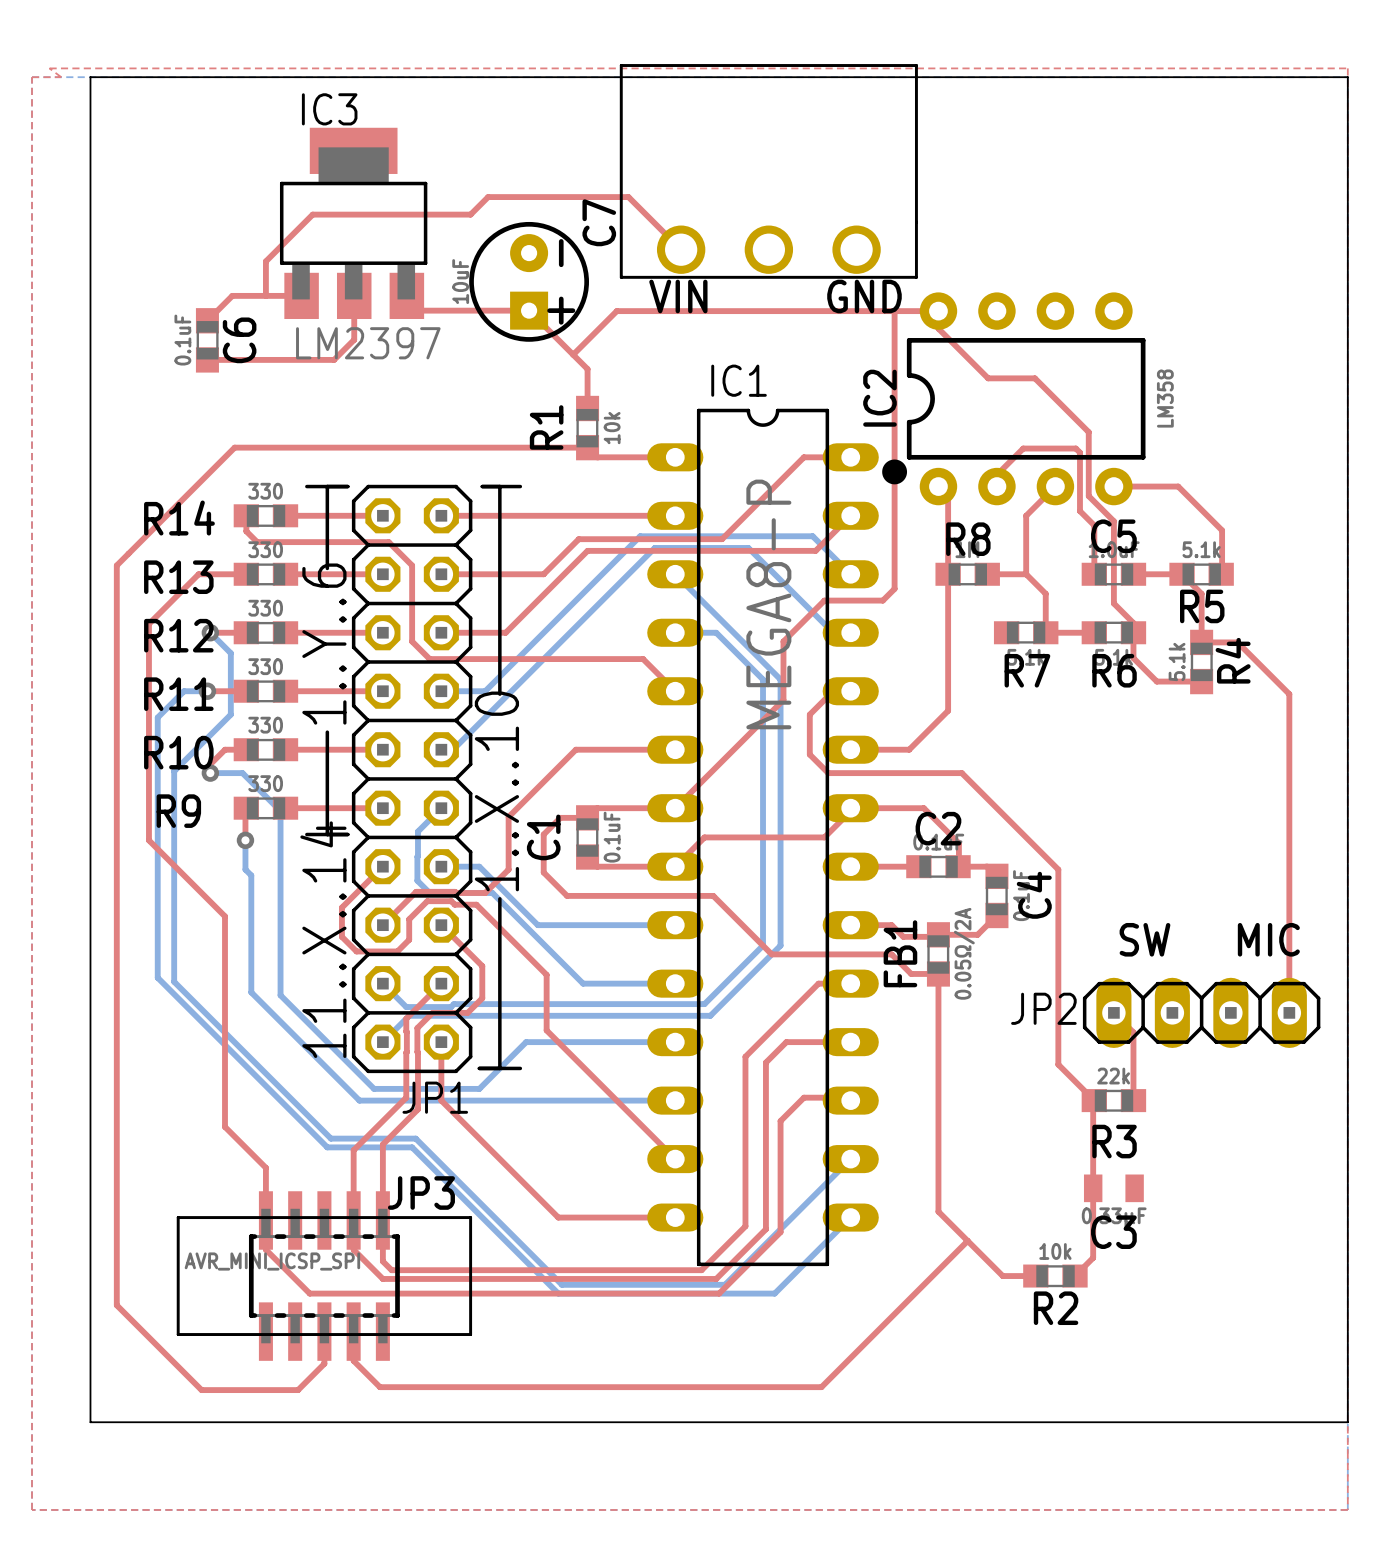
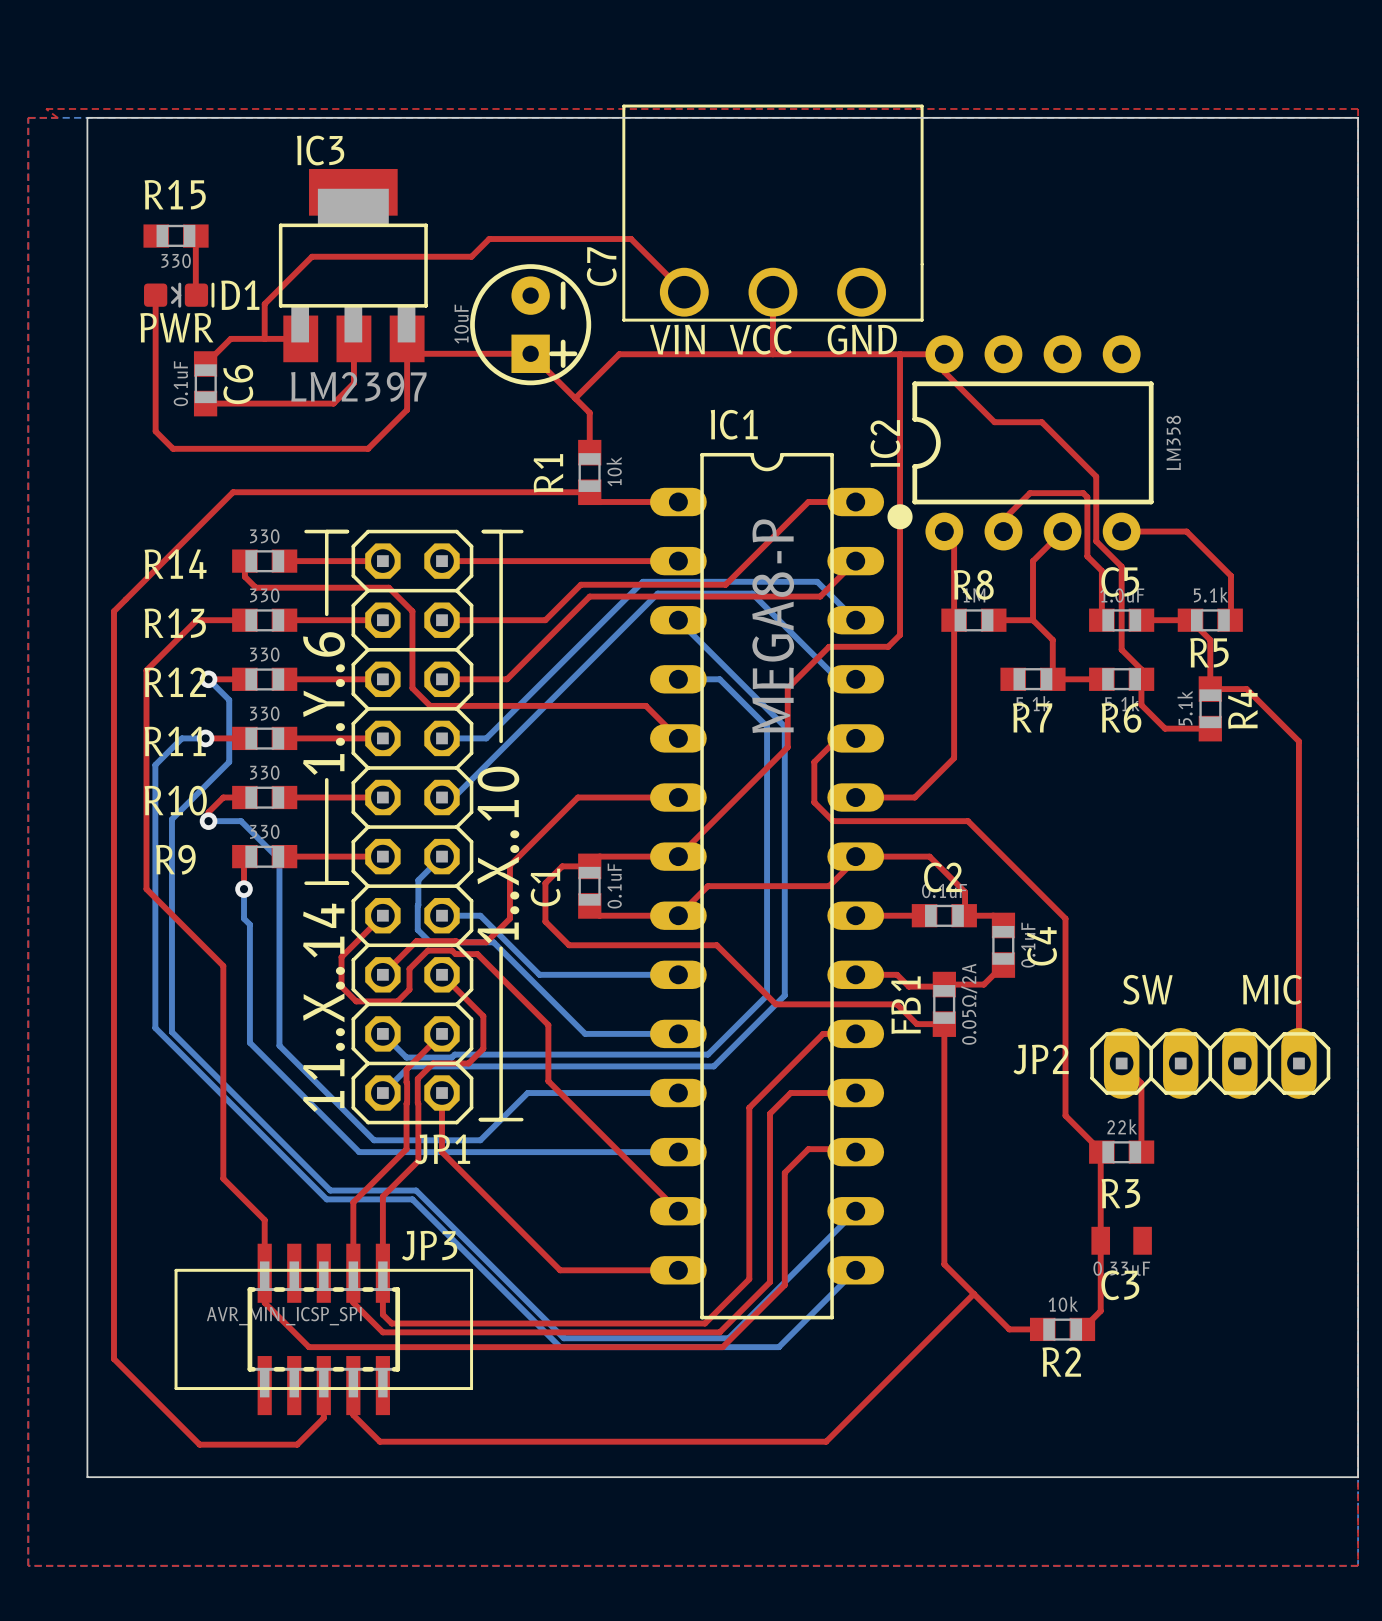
R15: none -> 330 (176, 236)
top track: none -> (195, 236) (196, 295)
top track: none -> (772, 292) (772, 354)
top track: none -> (155, 295) (155, 431) (173, 448) (368, 448) (407, 409) (407, 338)
D1: none -> (179, 295)
text: none -> PWR (176, 327)
text: none -> VCC (760, 339)

